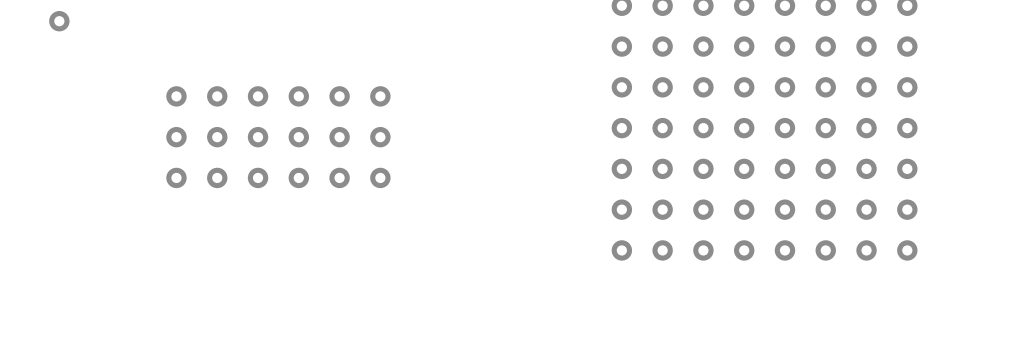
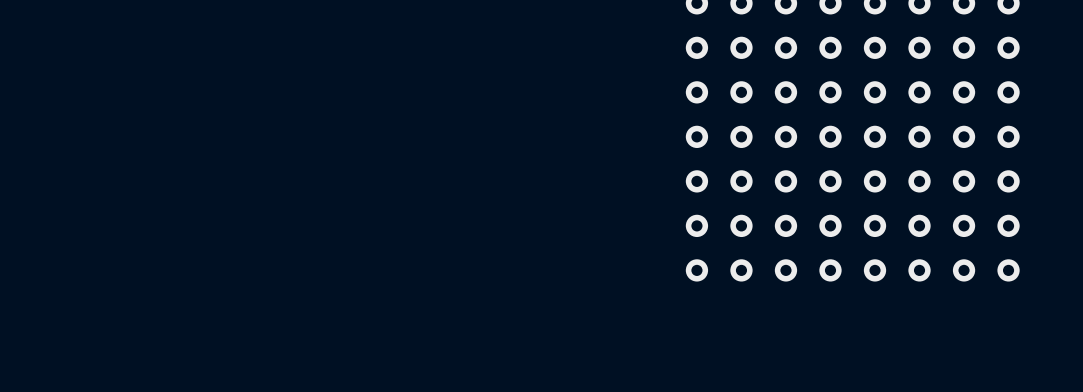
via: (59, 21) -> none
via: (176, 96) -> none
via: (217, 96) -> none
via: (258, 96) -> none
via: (298, 96) -> none
via: (339, 96) -> none
via: (380, 96) -> none
via: (176, 137) -> none
via: (217, 137) -> none
via: (258, 137) -> none
via: (298, 137) -> none
via: (339, 137) -> none
via: (380, 137) -> none
via: (176, 177) -> none
via: (217, 177) -> none
via: (258, 177) -> none
via: (298, 177) -> none
via: (339, 177) -> none
via: (380, 177) -> none

